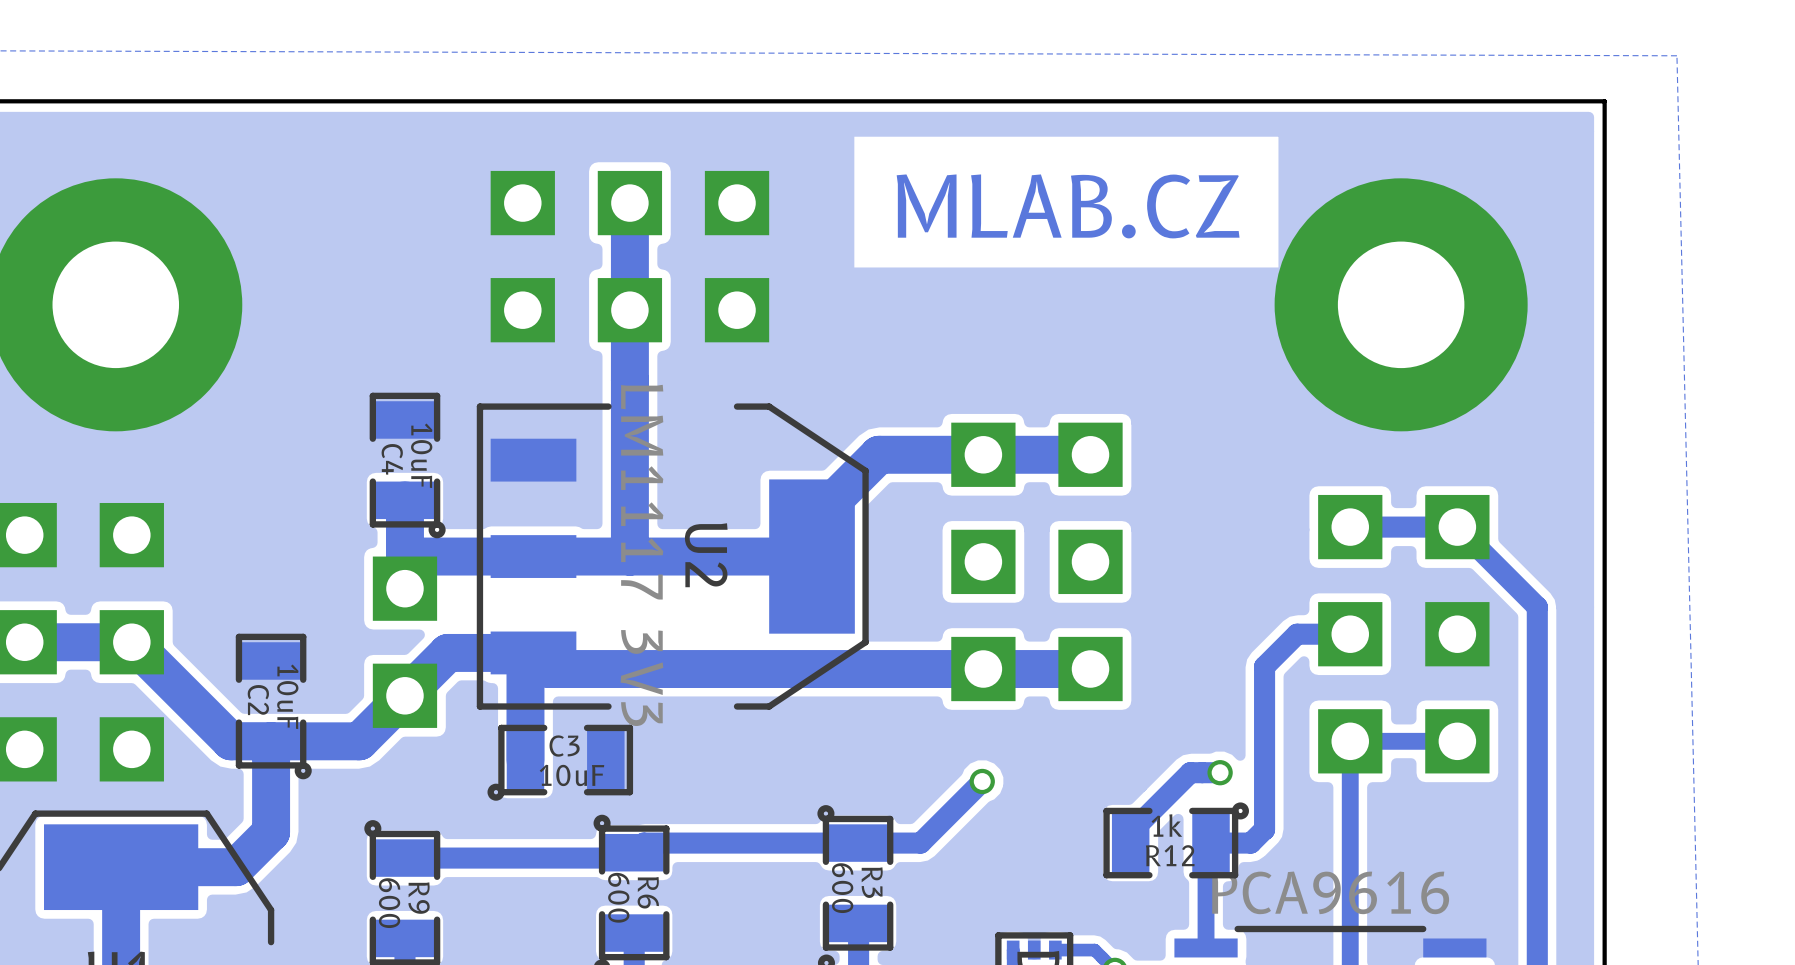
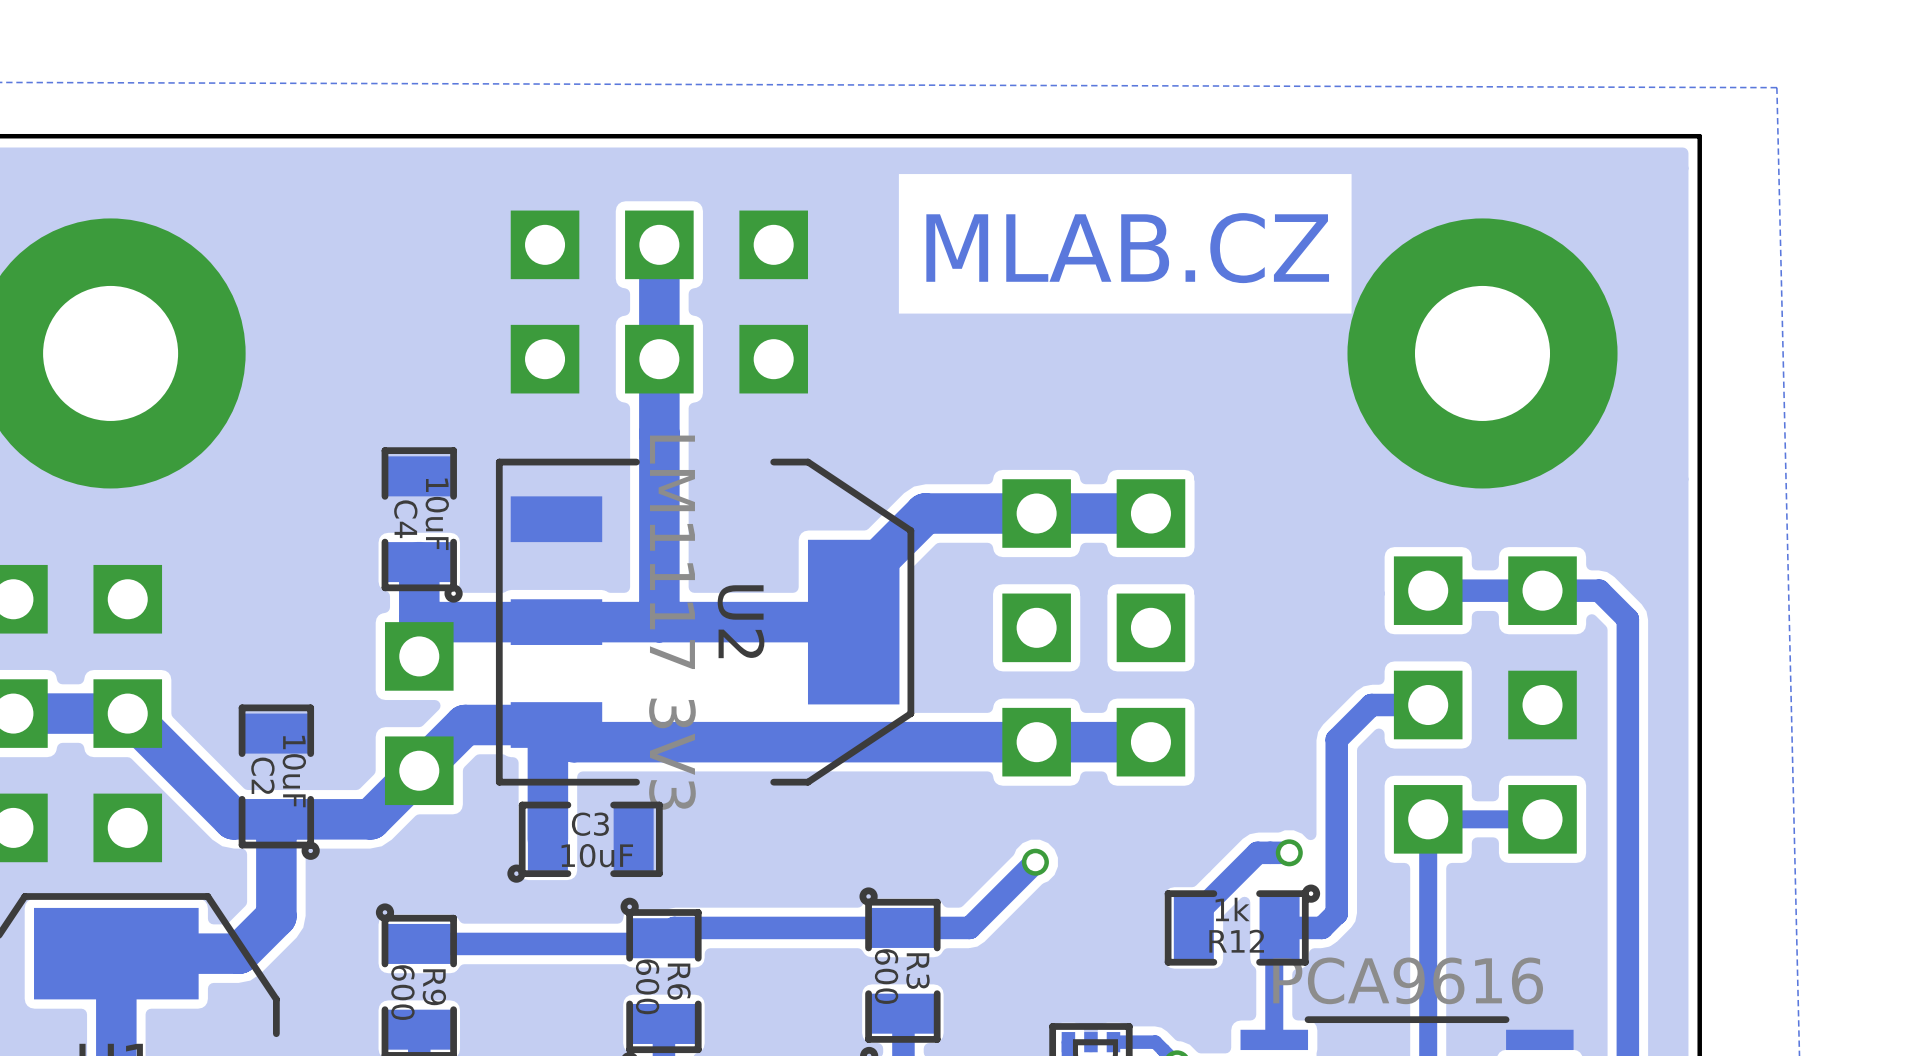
track: (1457, 527) (1537, 607) -> (1542, 590) (1599, 590) (1627, 619) (1627, 676)

